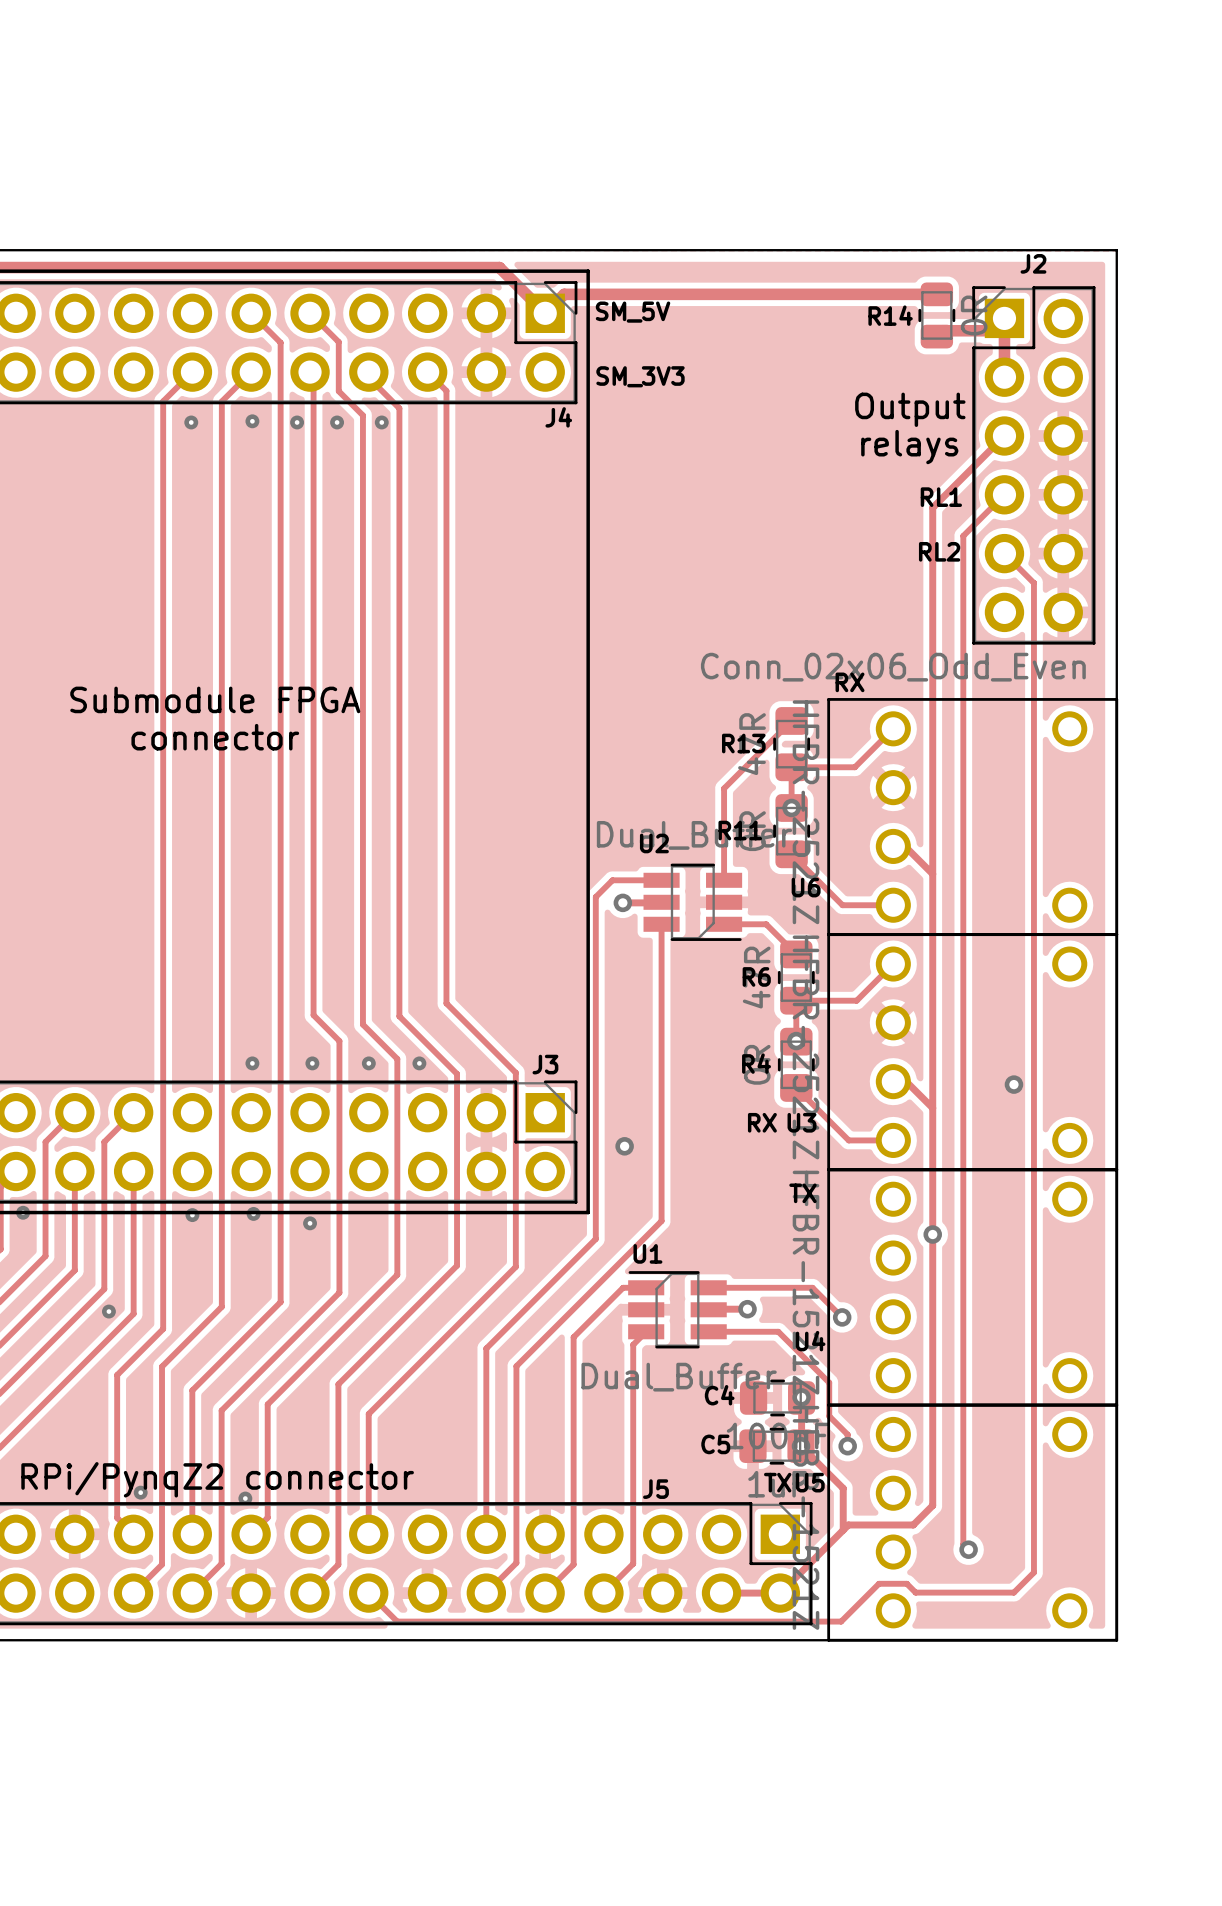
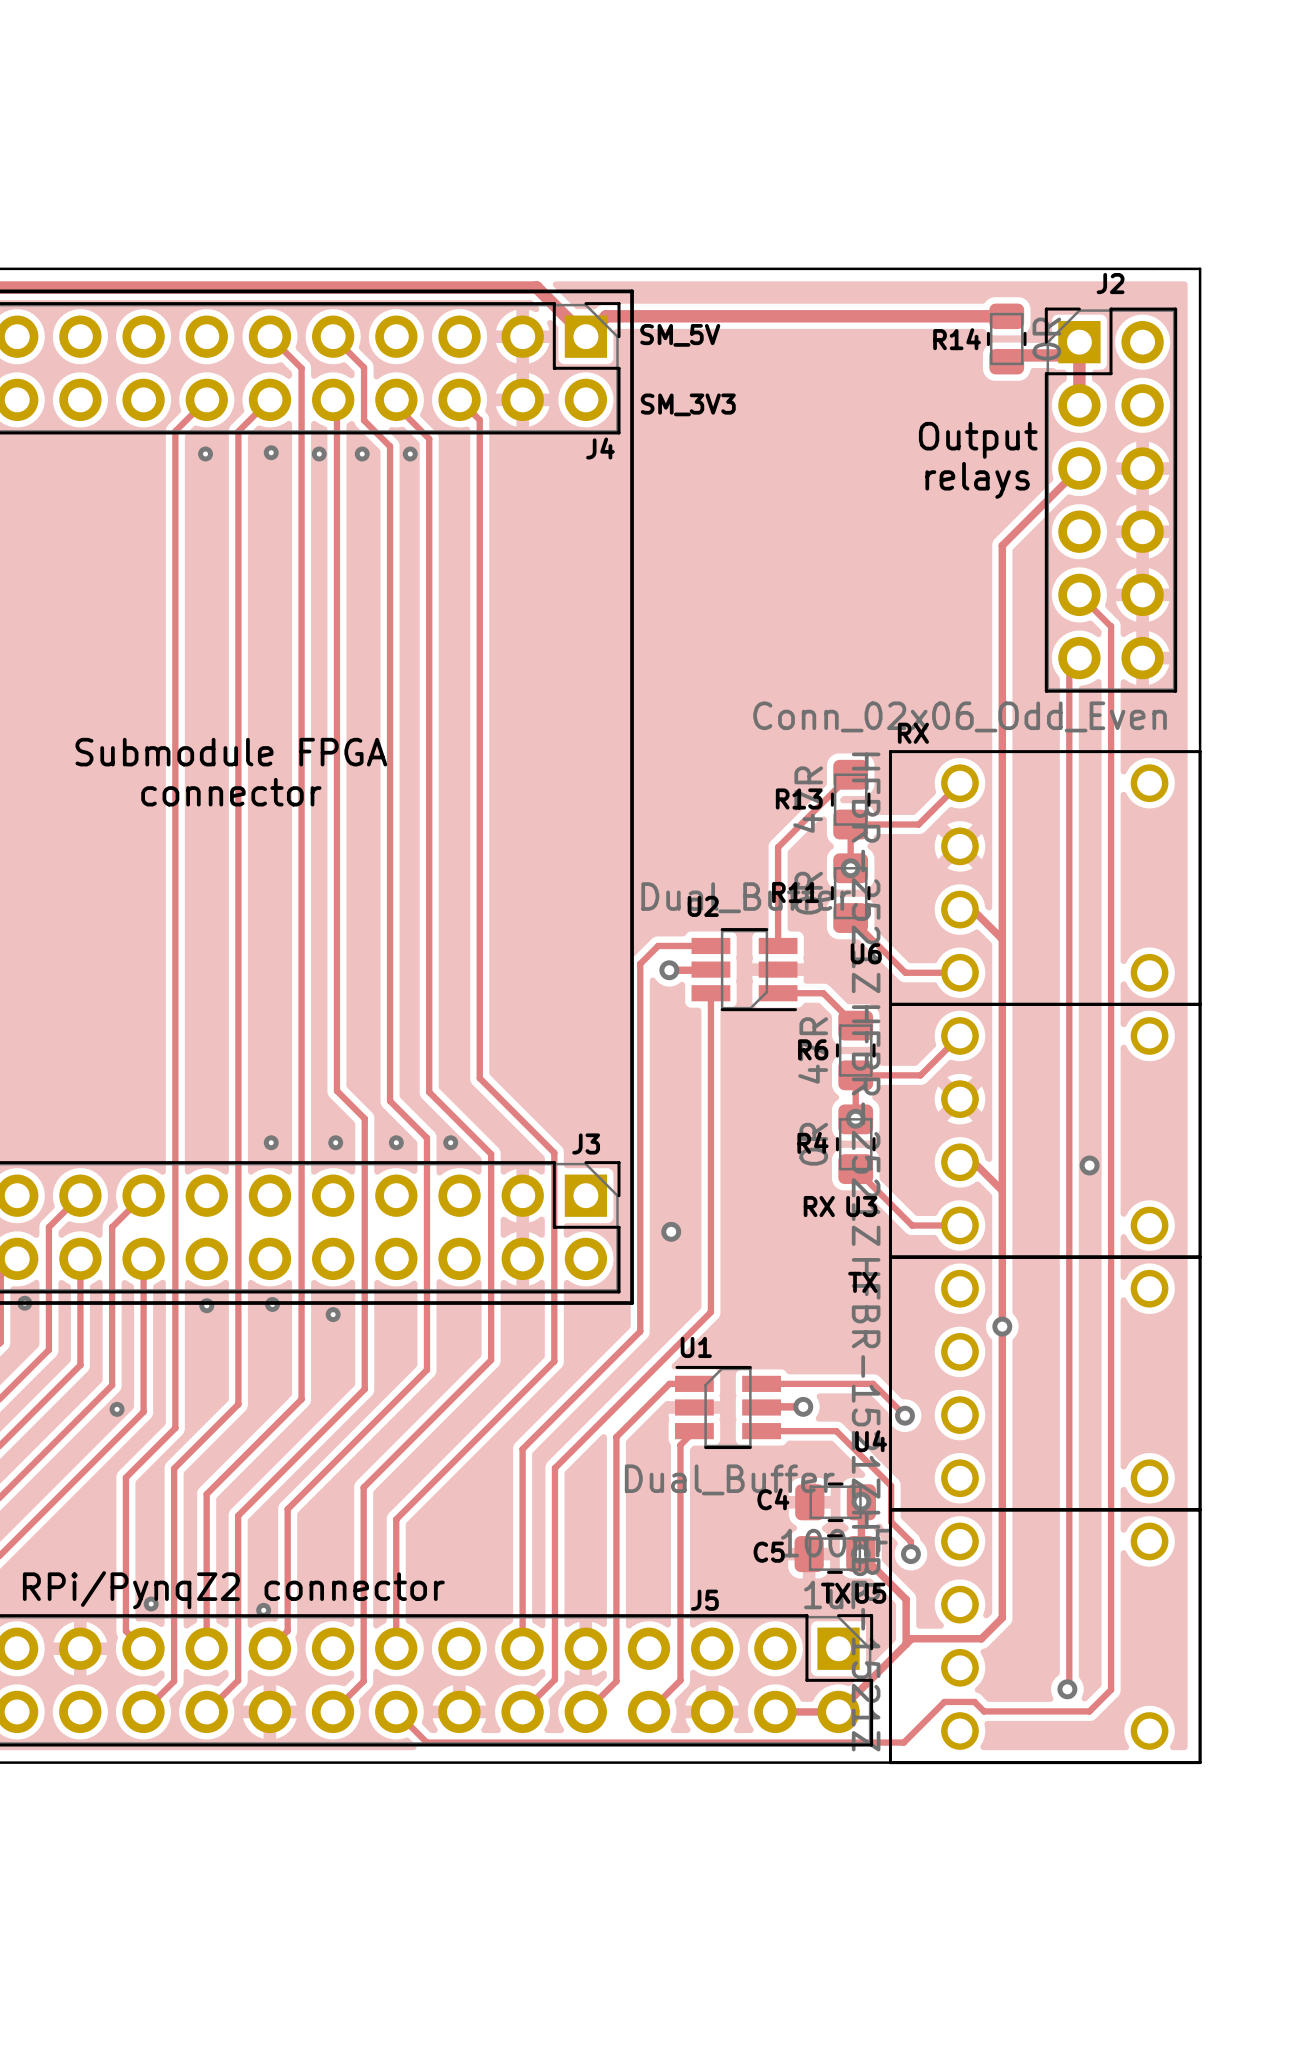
track: (1004, 494) (963, 535) (963, 1544) (968, 1549) -> none
text: RL1 (941, 497) -> none
text: RL2 (939, 551) -> none
track: none -> (1079, 658) (1069, 668) (1069, 1687) (1067, 1689)
via position: (968, 1549) -> (1067, 1689)

